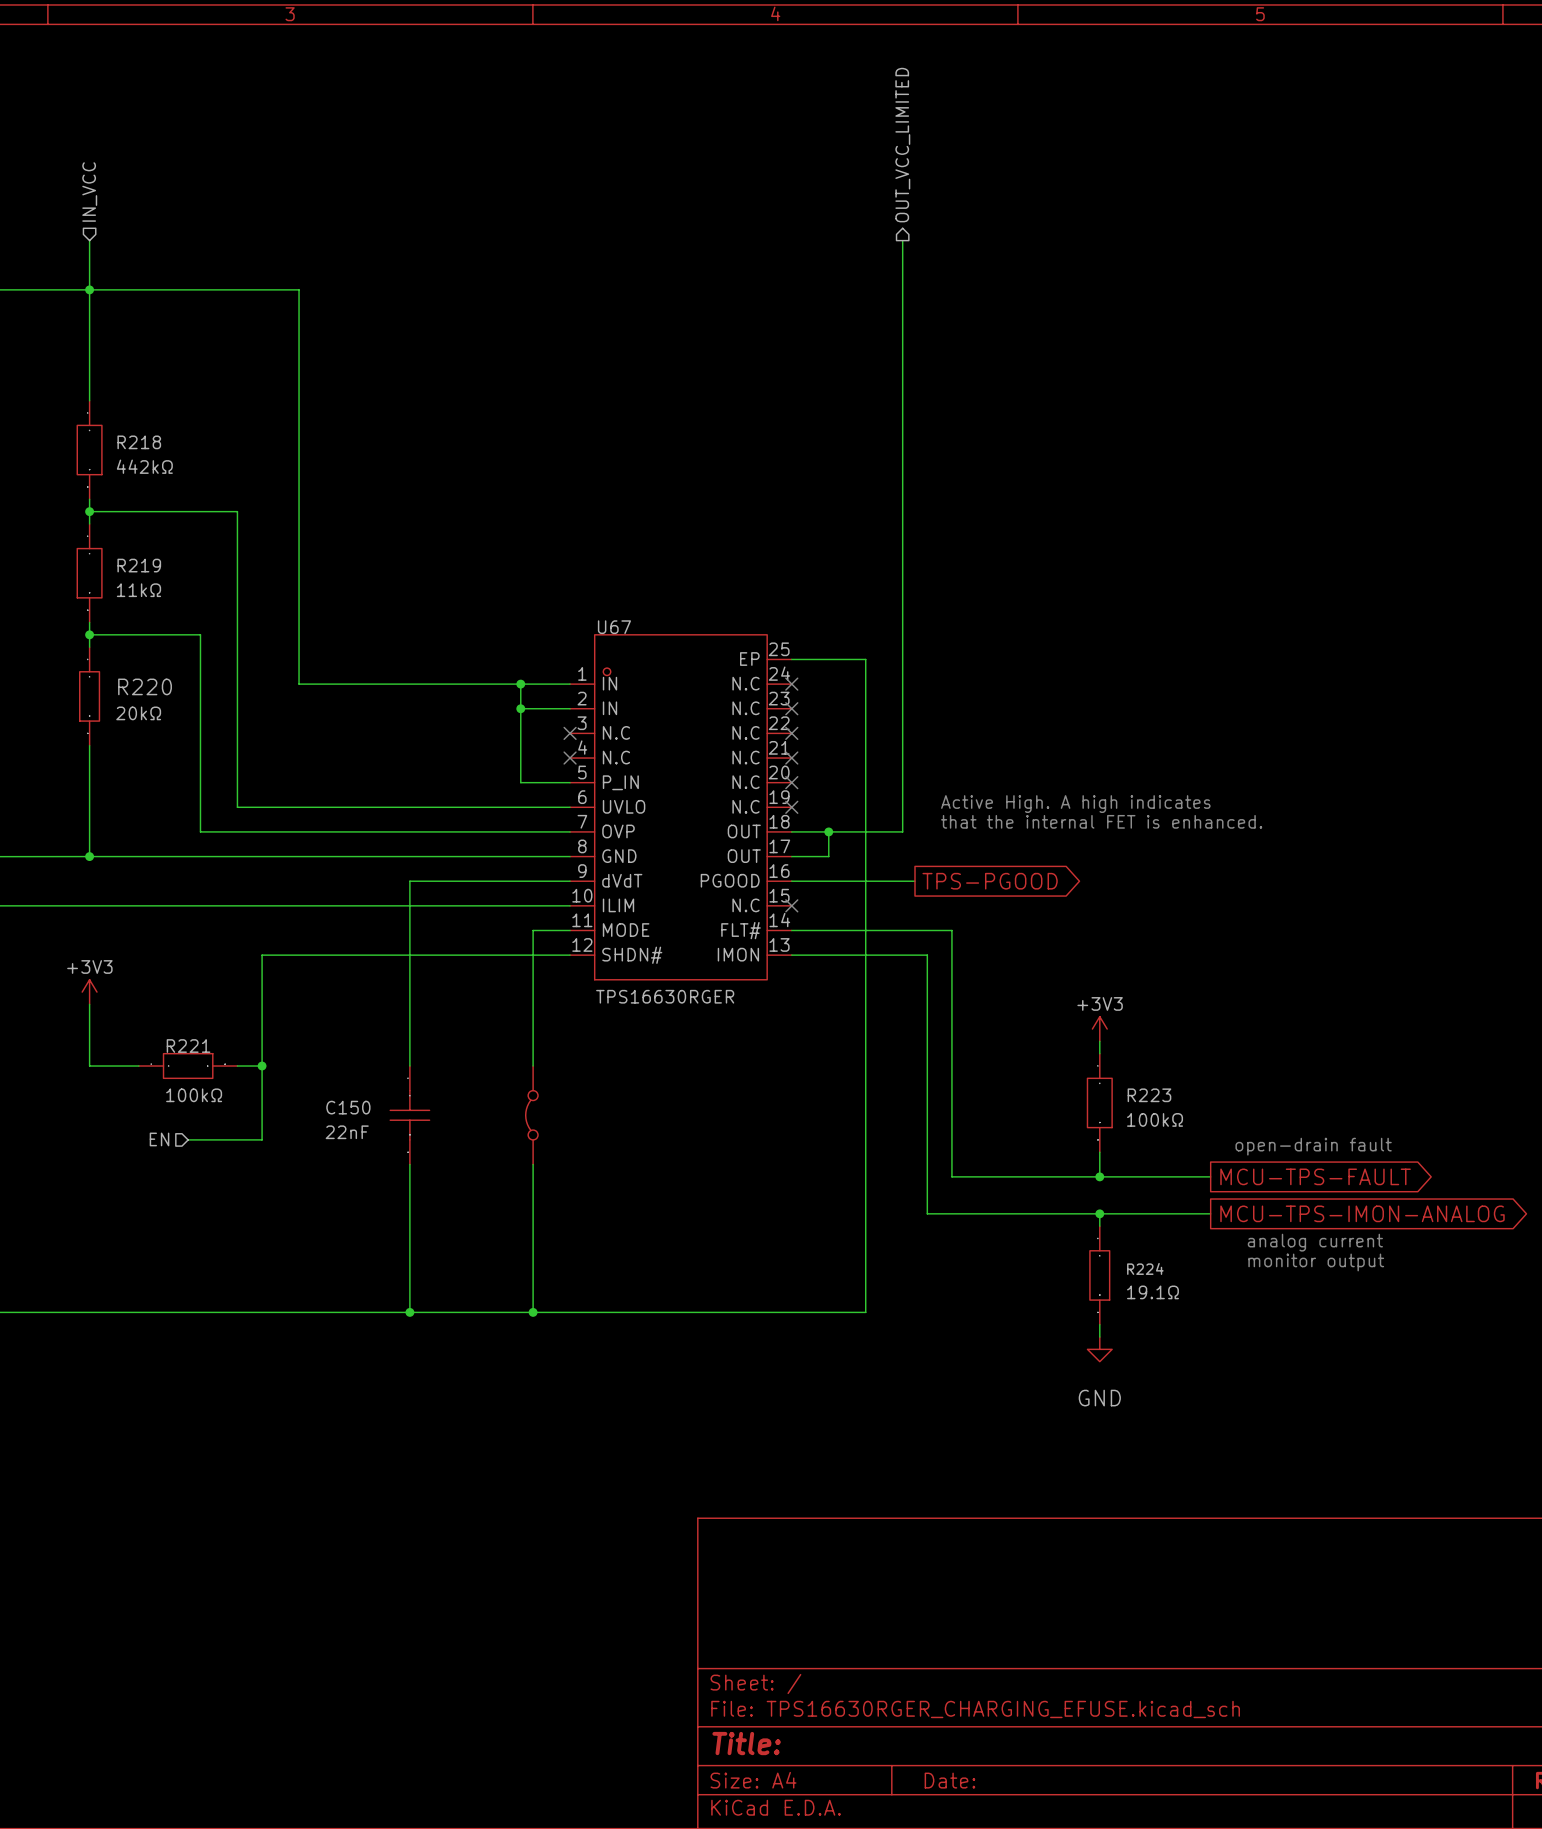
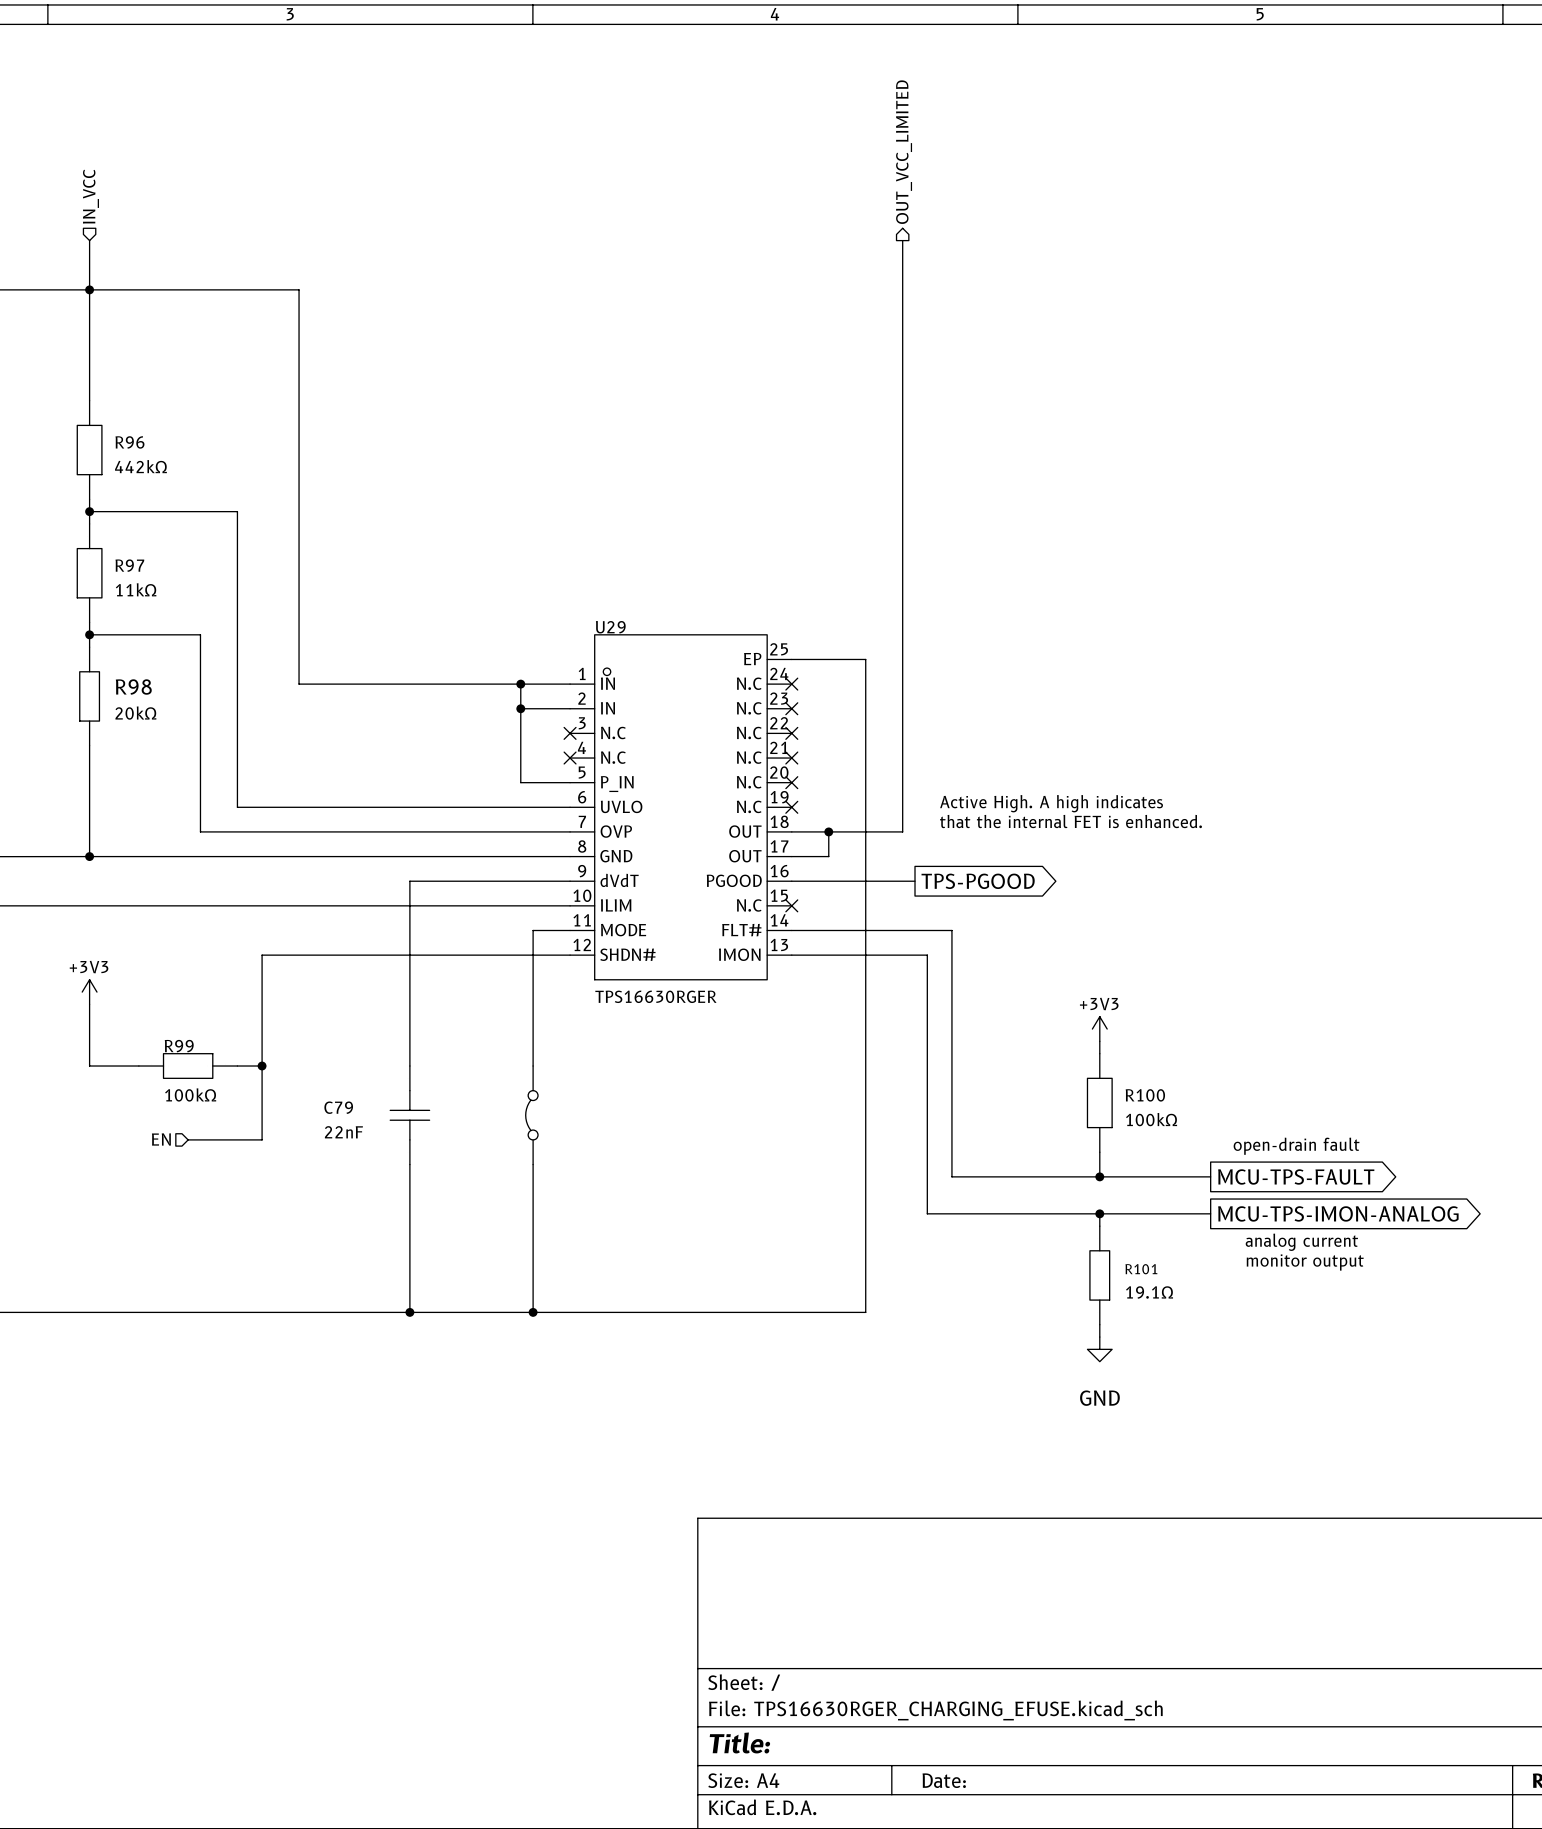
R218 name: R218 (139, 442) -> R96 (129, 442)
R219 name: R219 (139, 565) -> R97 (129, 565)
U67 name: U67 (614, 627) -> U29 (610, 627)
R220 name: R220 (145, 686) -> R98 (133, 687)
R221 name: R221 (188, 1046) -> R99 (179, 1046)
R223 name: R223 (1149, 1095) -> R100 (1145, 1095)
C150 name: C150 (348, 1107) -> C79 (338, 1107)
R224 name: R224 (1145, 1268) -> R101 (1141, 1269)

